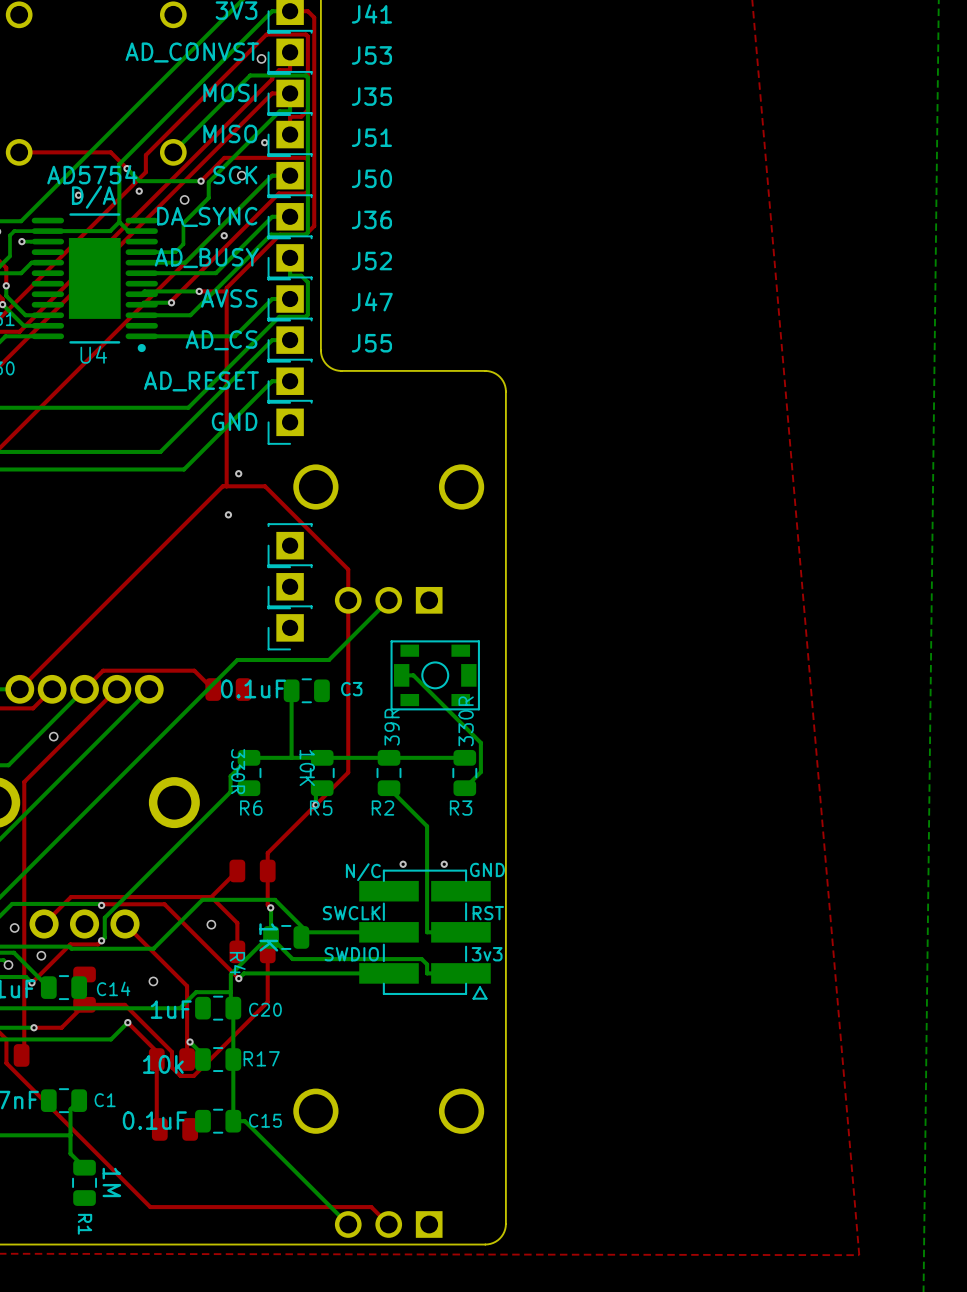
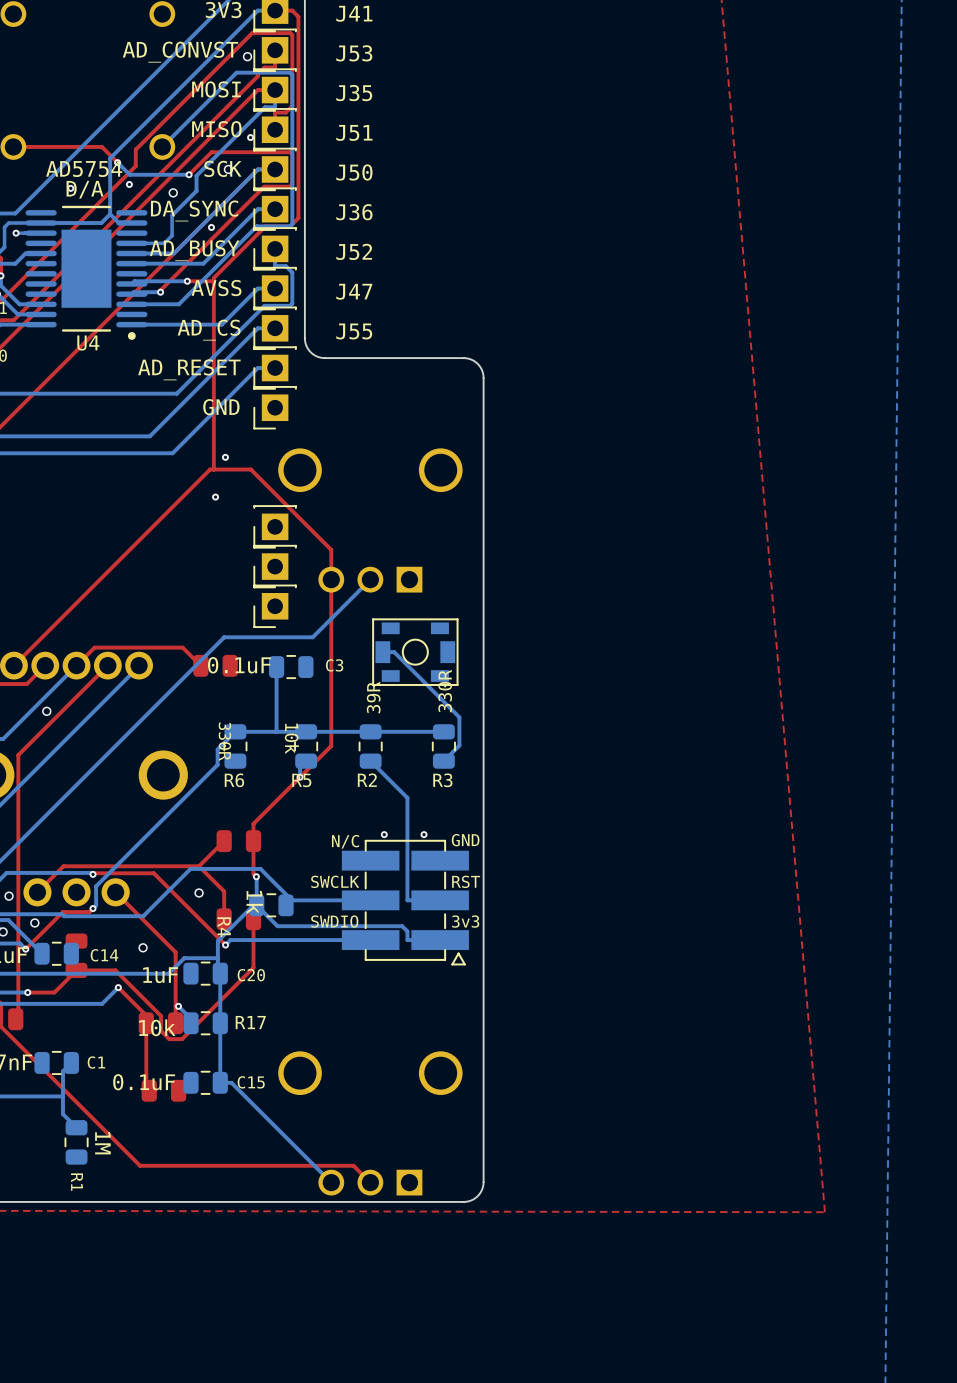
R5 value: 10K (307, 767) -> 10k (291, 738)
R4 value: 1K (268, 937) -> 1k (254, 902)

